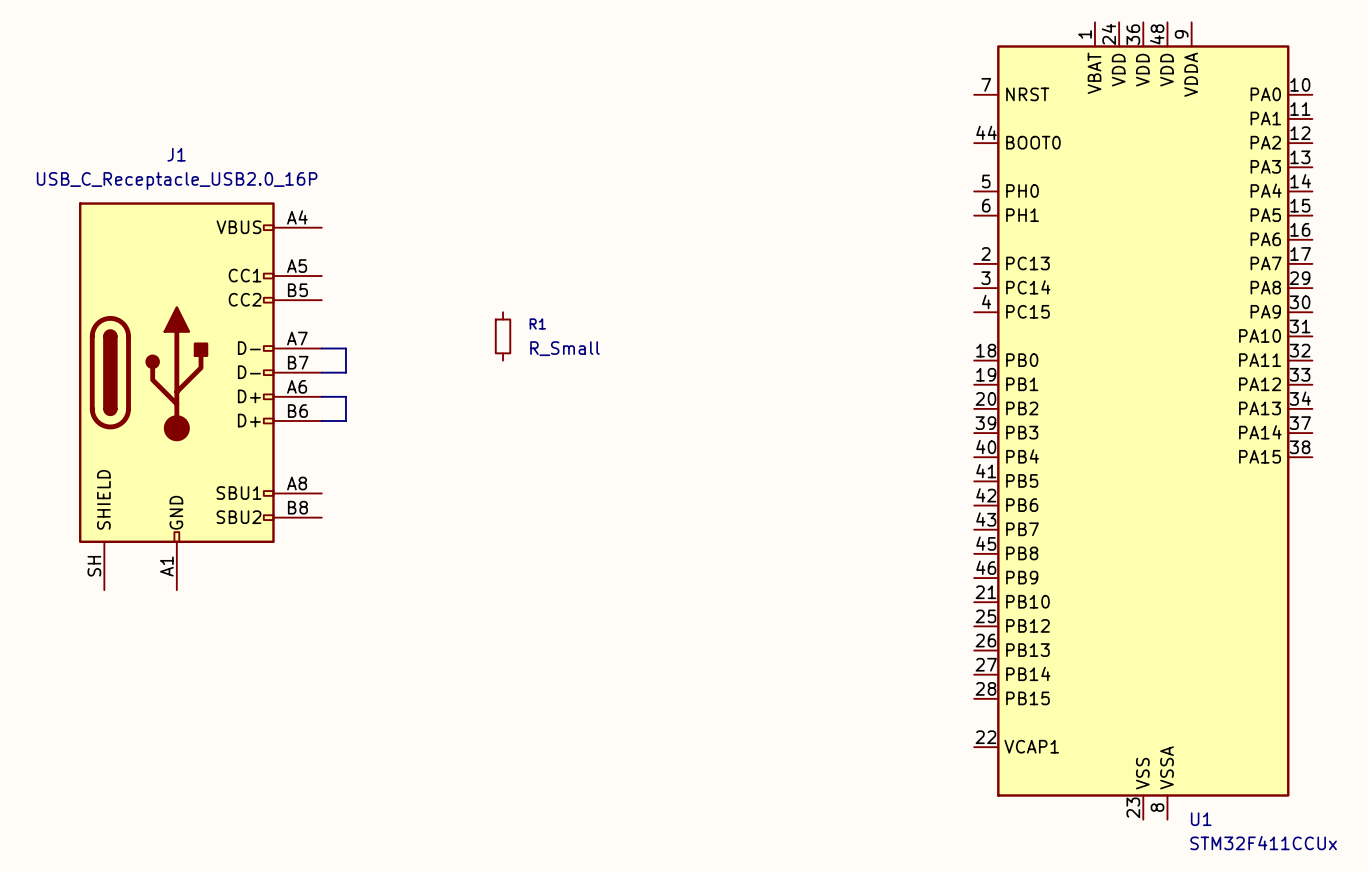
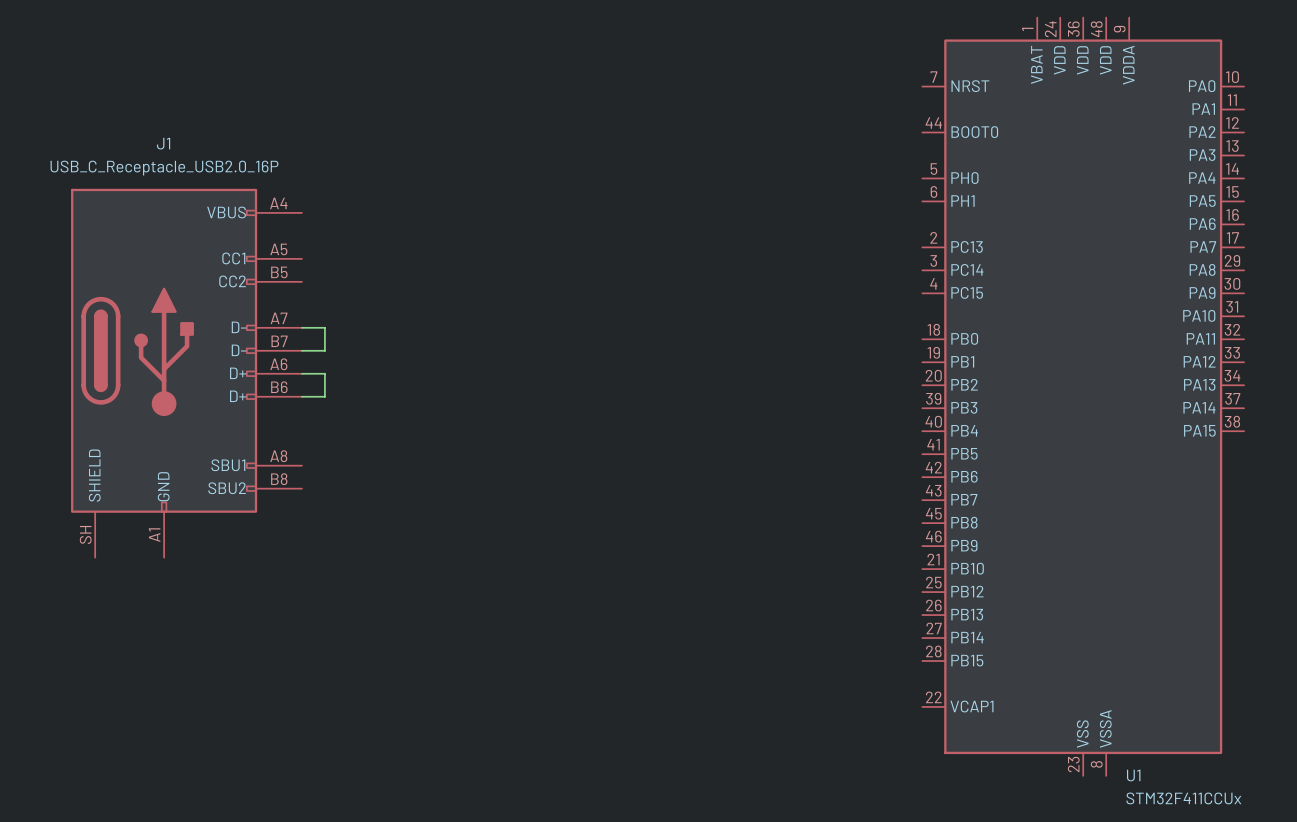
R1: R_Small (503, 336) -> none

